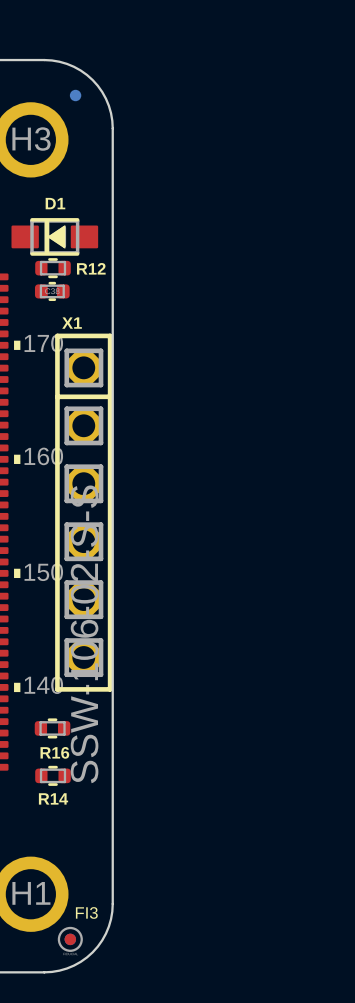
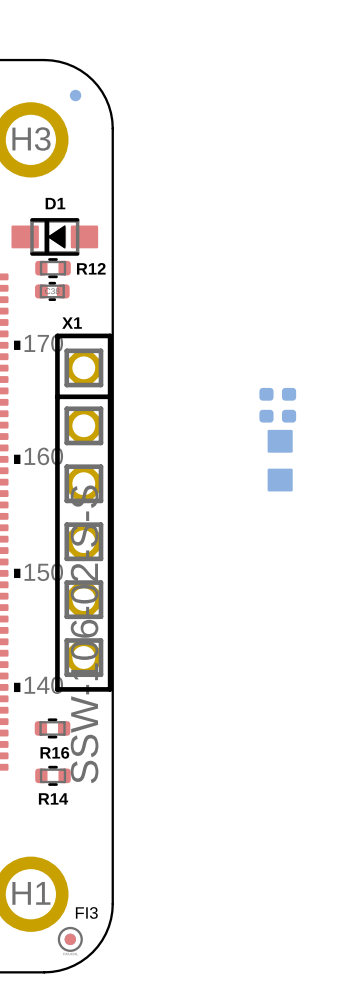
part: none -> (266, 405)
part: none -> (289, 405)
part: none -> (280, 460)

